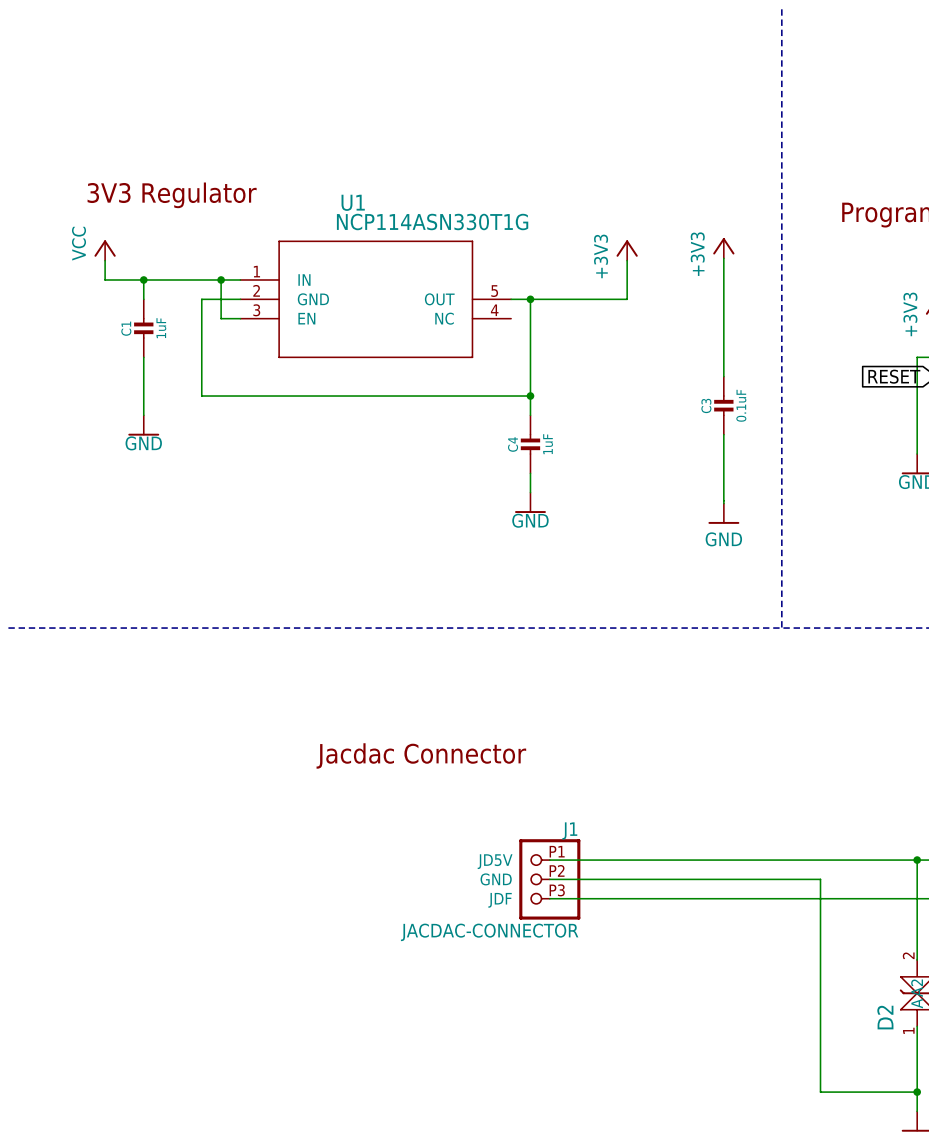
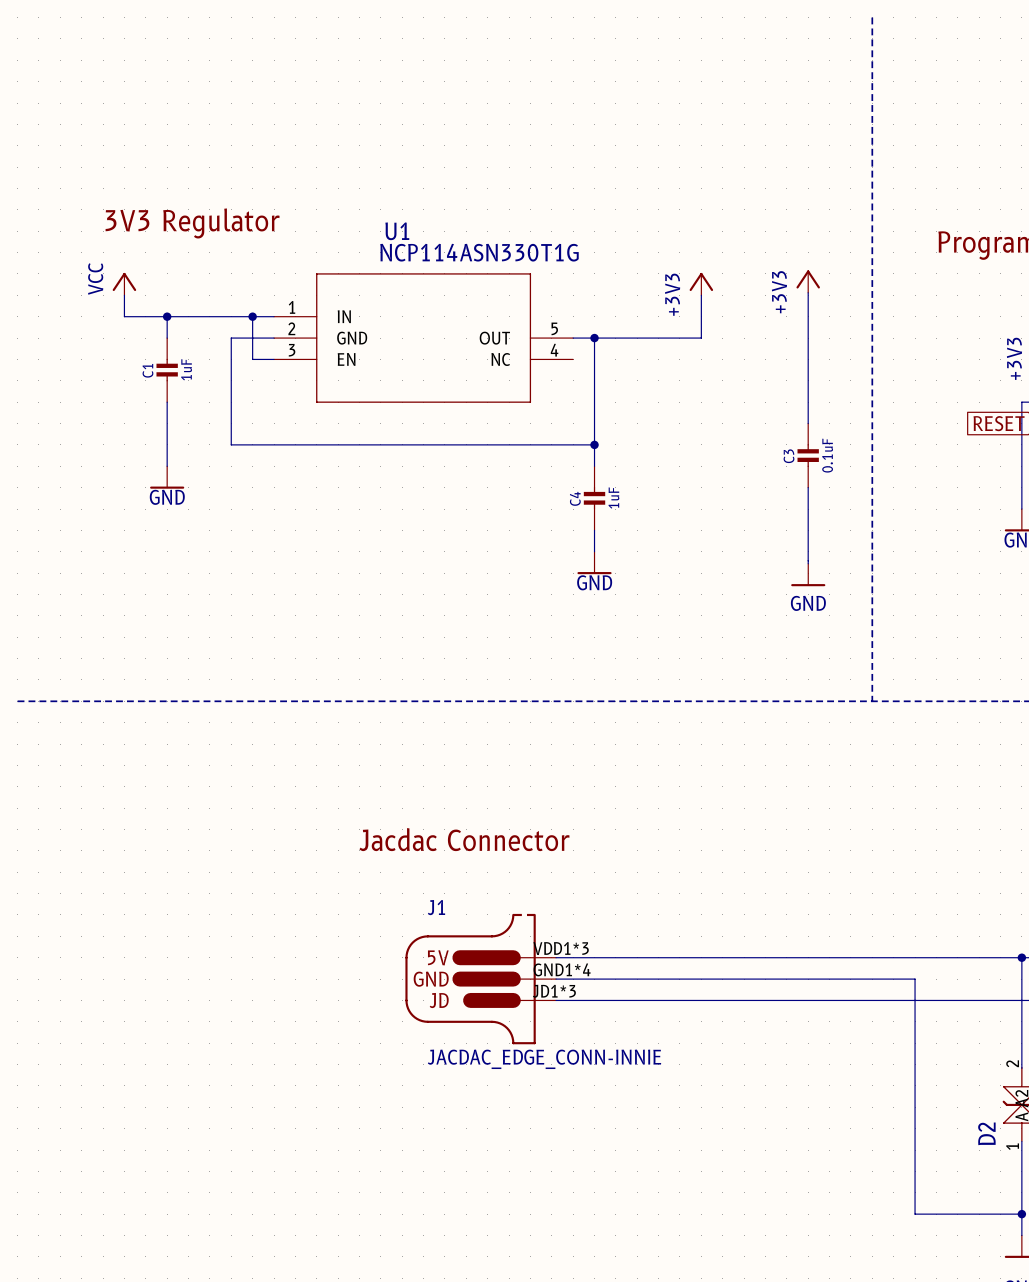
J1 name position: J1 (569, 830) -> J1 (436, 907)
J1 symbol: [519, 839, 581, 920] -> [405, 913, 557, 1045]
wire: none -> (556, 957) (615, 957)
wire: none -> (556, 979) (615, 979)
wire: none -> (556, 1000) (615, 1000)
J1 value: JACDAC-CONNECTOR (489, 932) -> JACDAC_EDGE_CONN-INNIE (544, 1059)

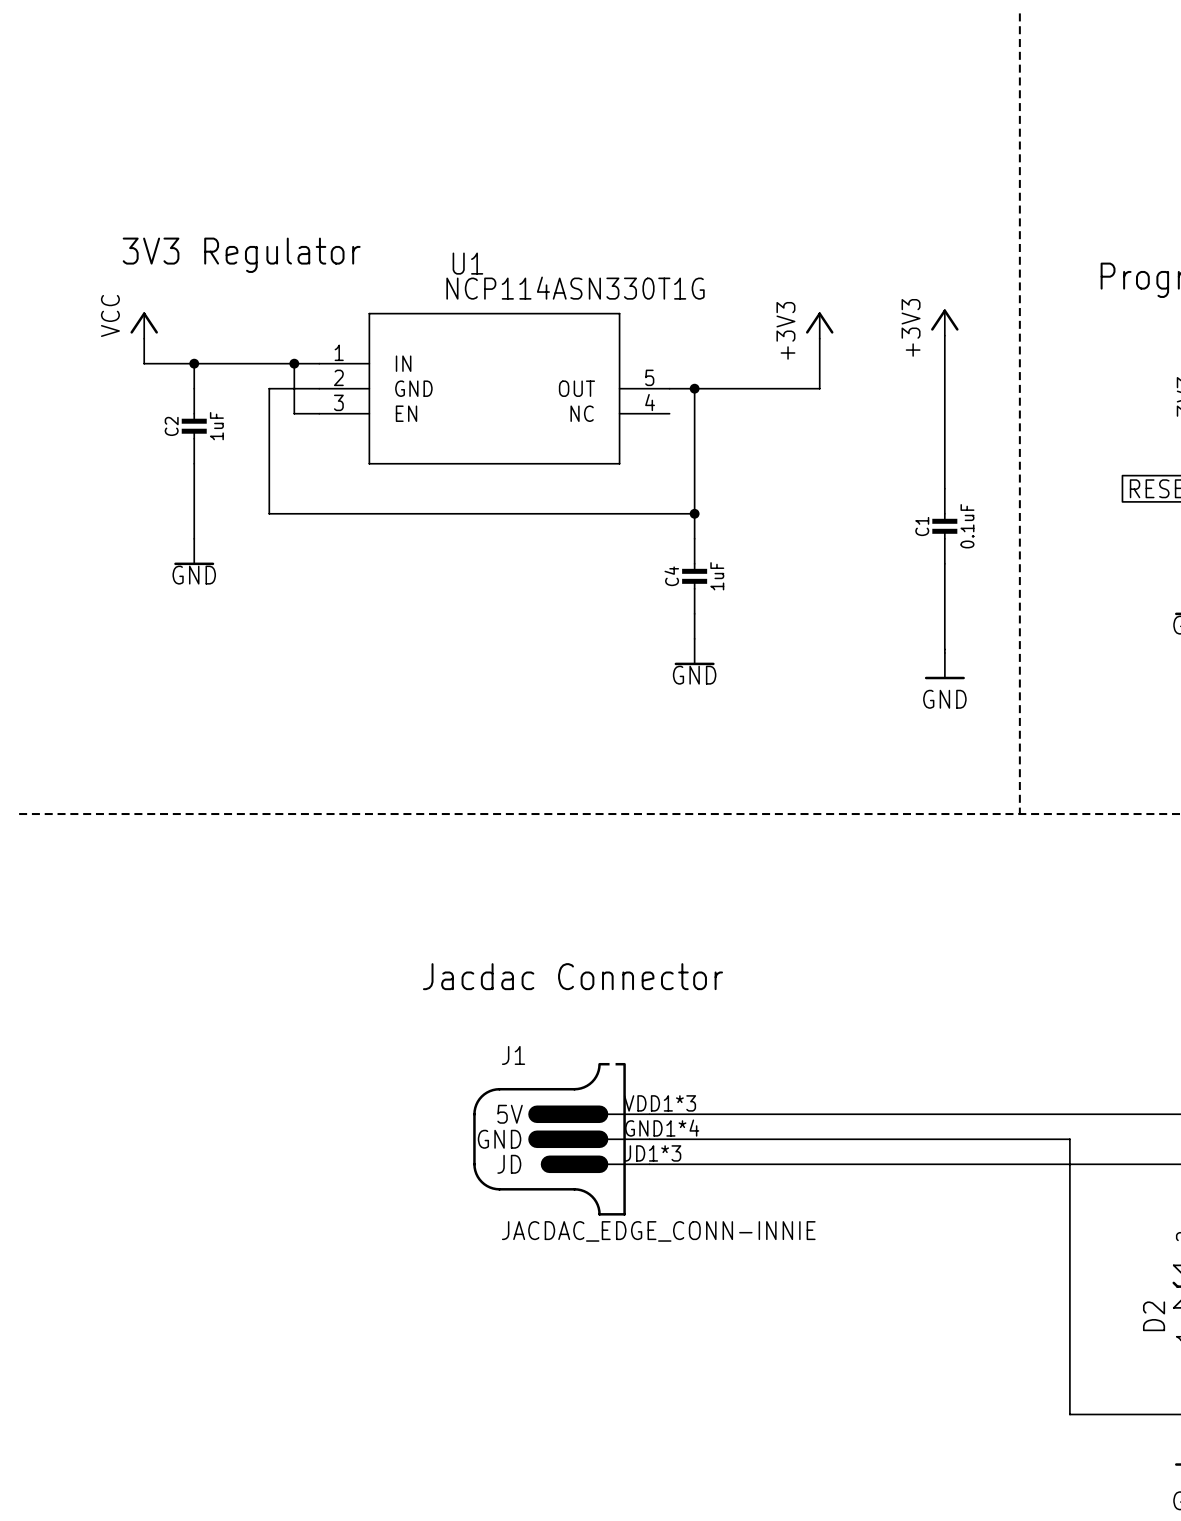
C1 name: C1 (147, 370) -> C2 (171, 426)
C3 name: C3 (789, 456) -> C1 (922, 526)

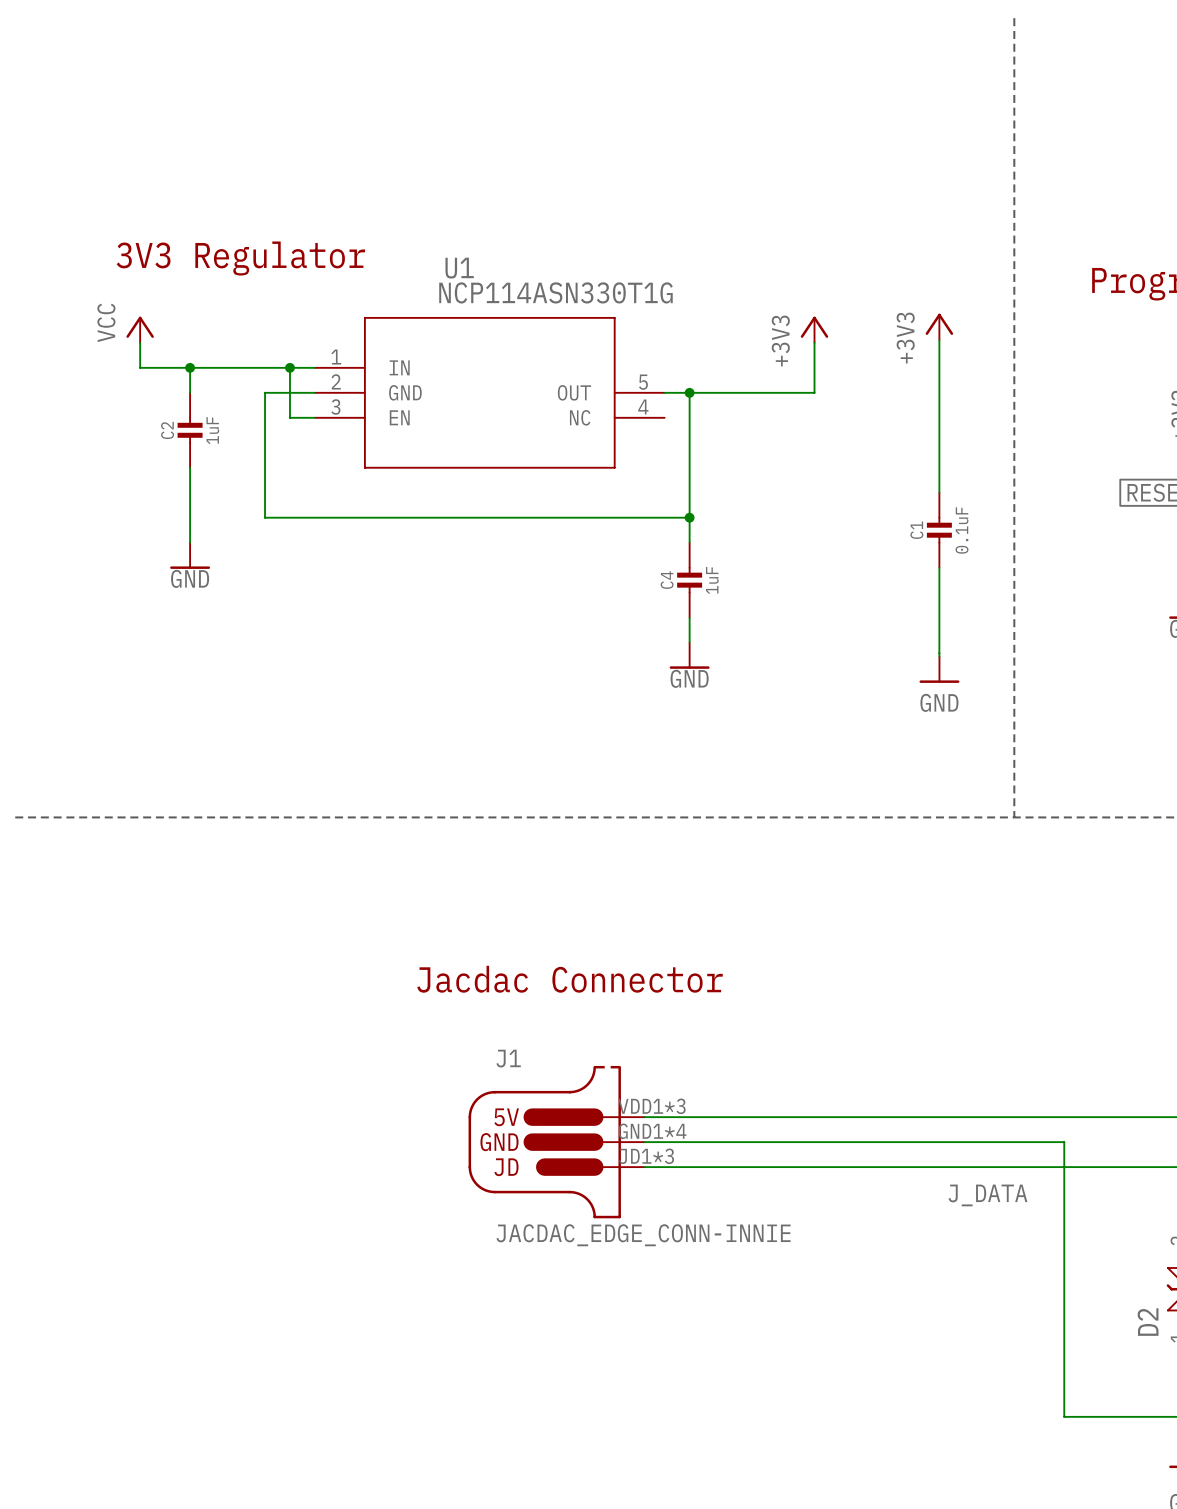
label: none -> J_DATA (987, 1195)

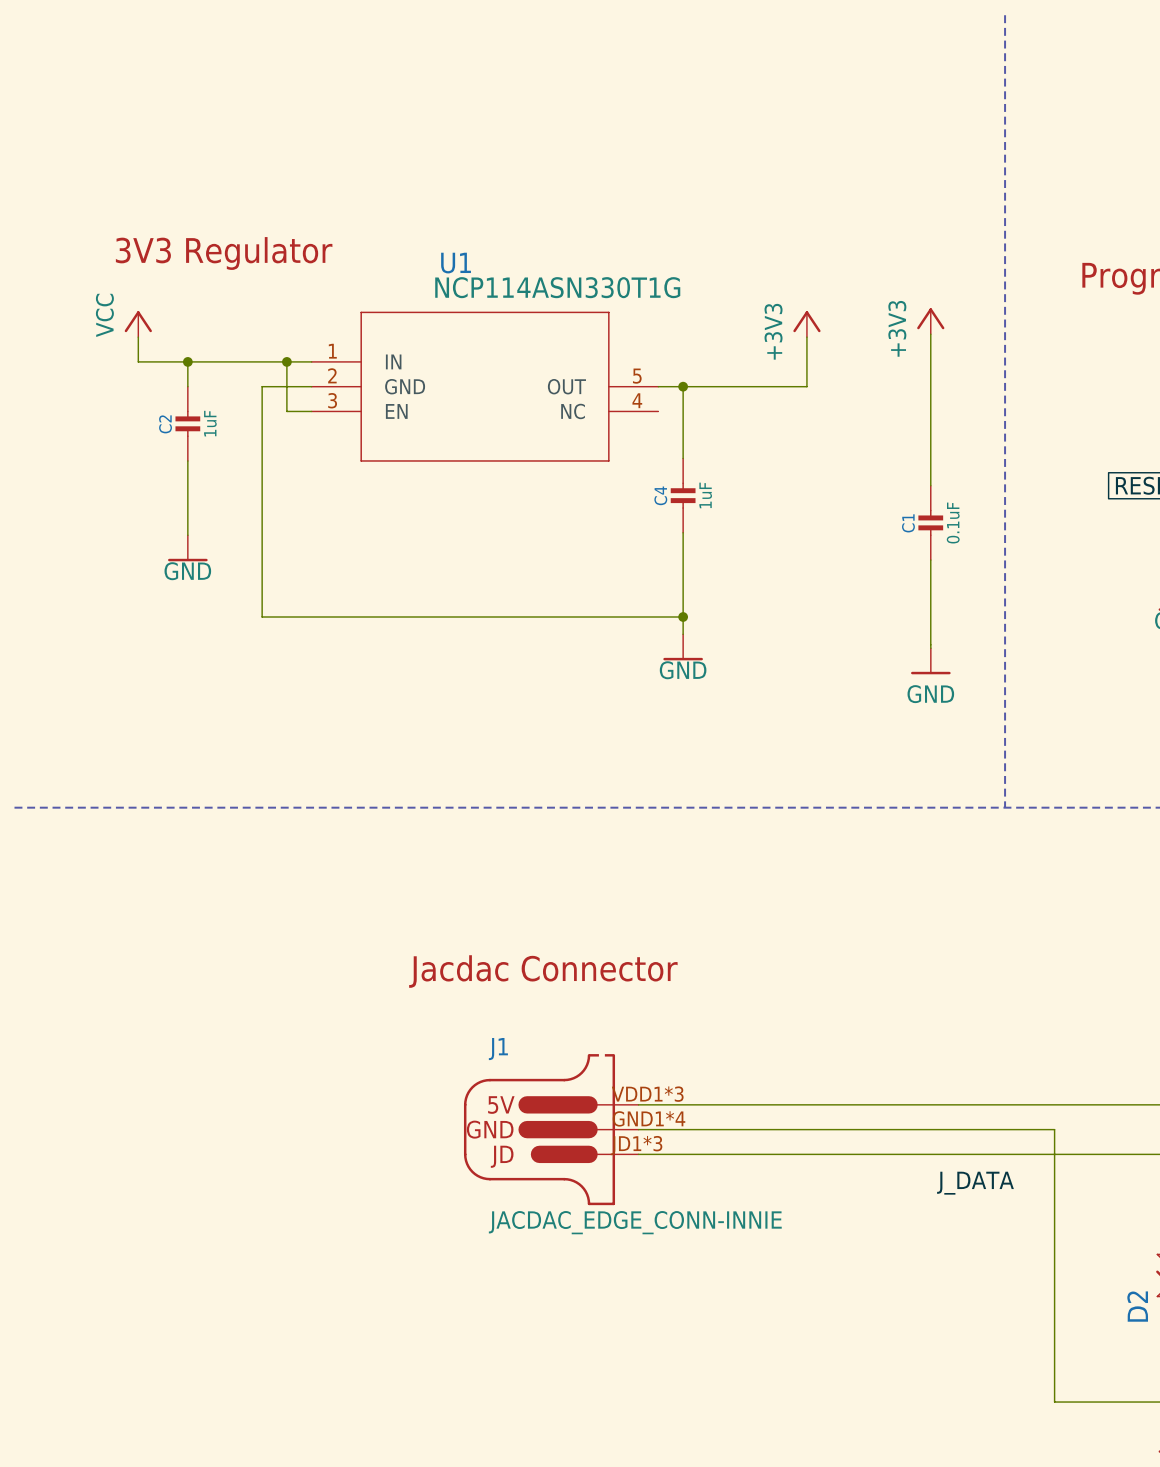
wire: (265, 517) (689, 517) -> (262, 510) (262, 617) (683, 617)
junction: (689, 517) -> none
C4 position: (689, 580) -> (683, 495)
junction: none -> (683, 617)

